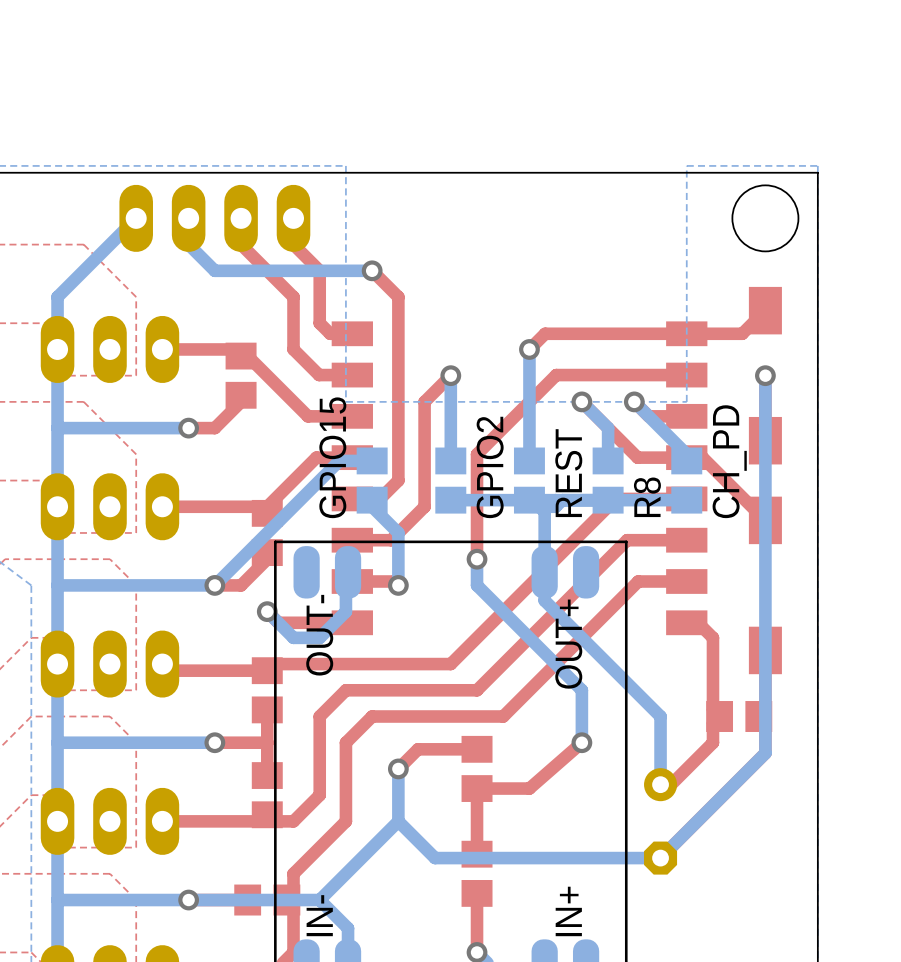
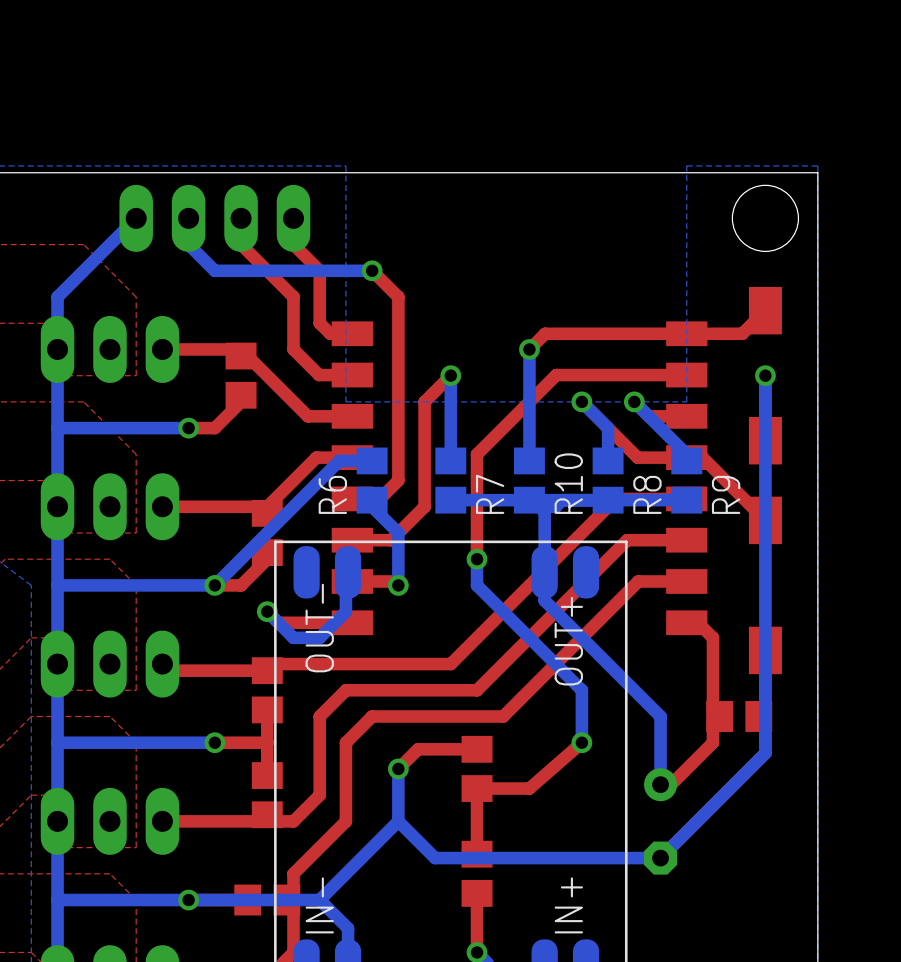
GPIO15 name: GPIO15 (332, 457) -> R6 (332, 494)
CH_PD name: CH_PD (729, 461) -> R9 (726, 494)
GPIO2 name: GPIO2 (490, 467) -> R7 (490, 494)
REST name: REST (568, 473) -> R10 (568, 483)

